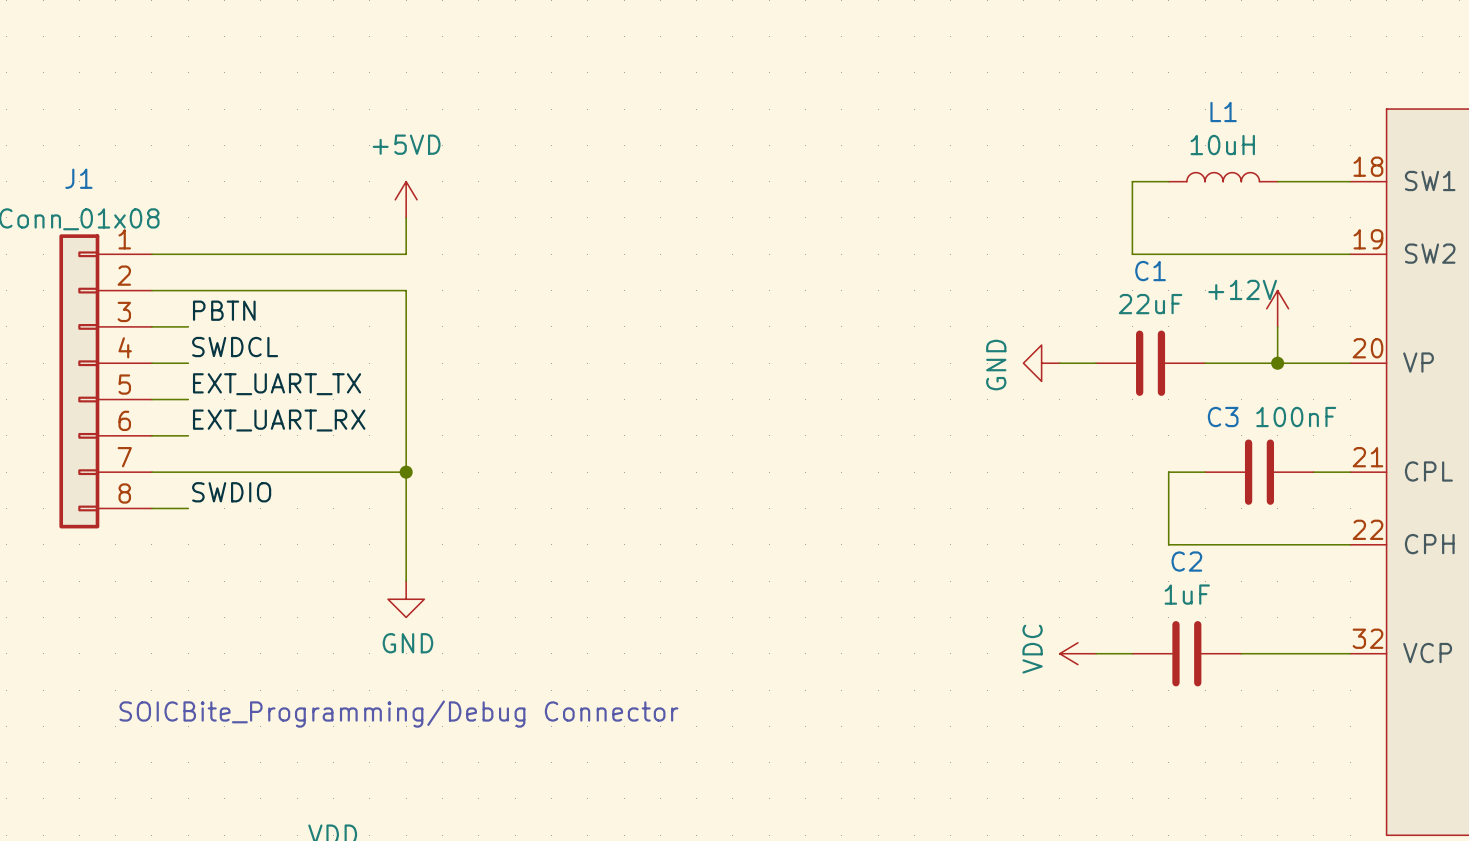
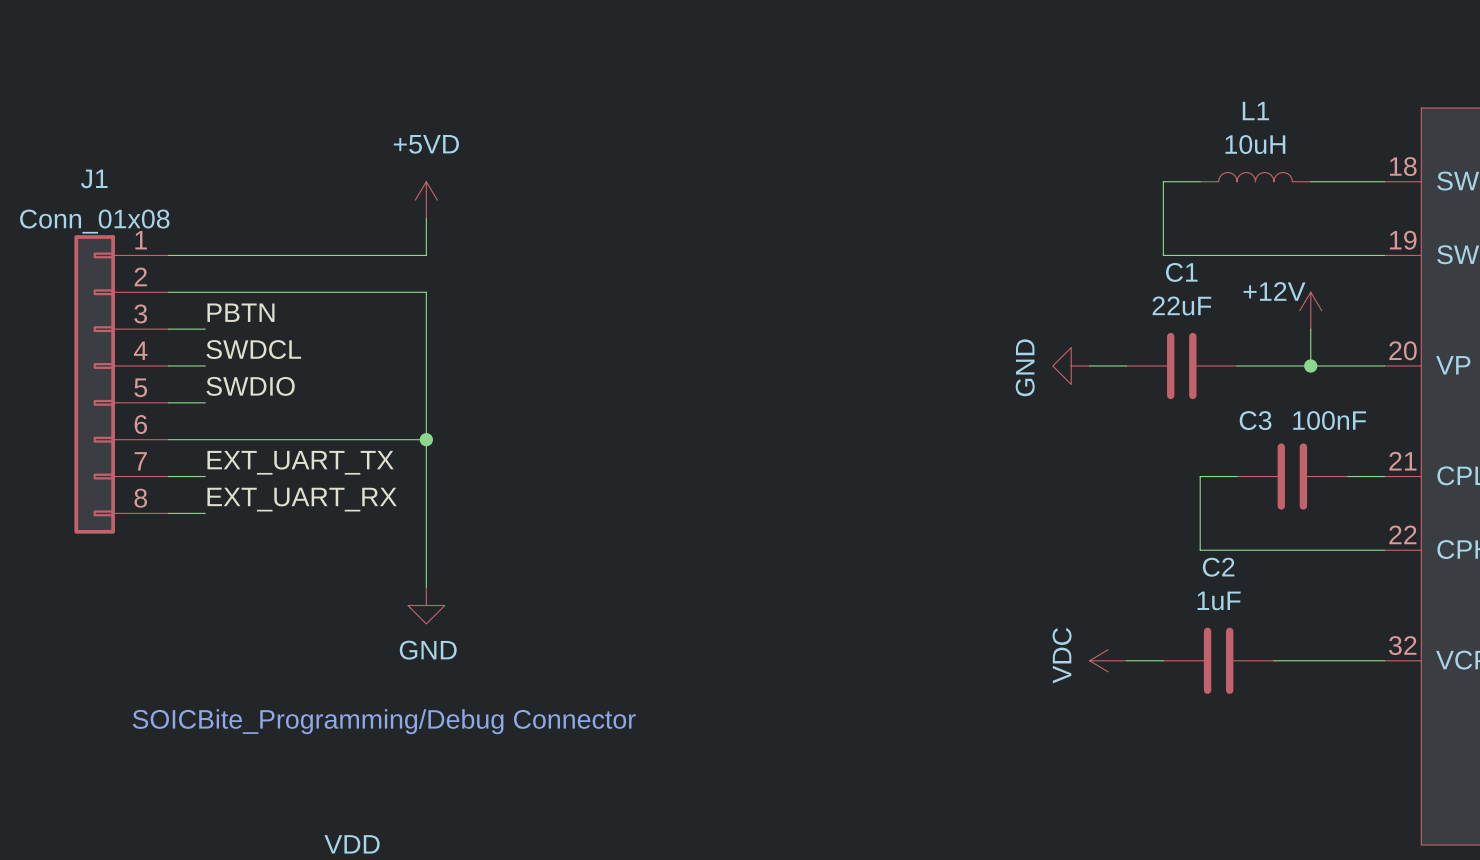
label: EXT_UART_TX (277, 384) -> SWDIO (250, 386)
label: EXT_UART_RX (279, 420) -> EXT_UART_TX (300, 462)
wire: (188, 472) (406, 472) -> (205, 439) (426, 439)
junction position: (406, 472) -> (426, 439)
label: SWDIO (231, 492) -> EXT_UART_RX (302, 499)

